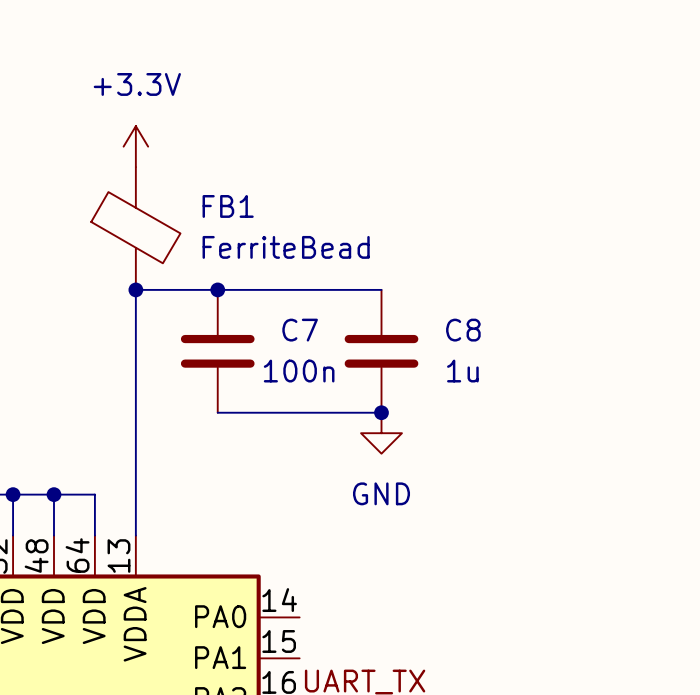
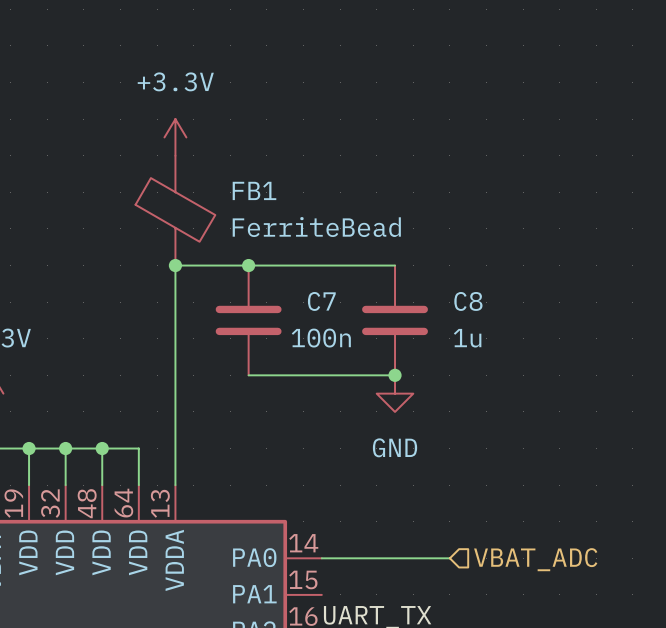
wire: none -> (321, 558) (449, 558)
hierarchical label: none -> VBAT_ADC (535, 559)

